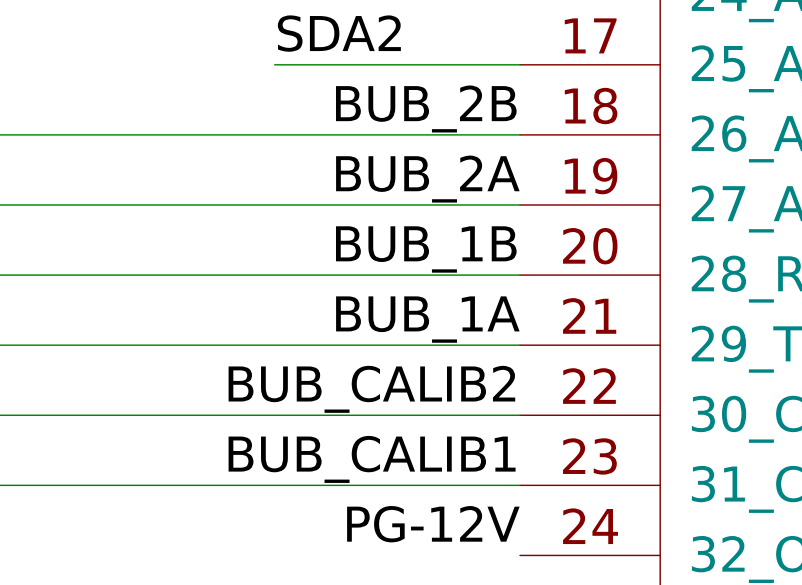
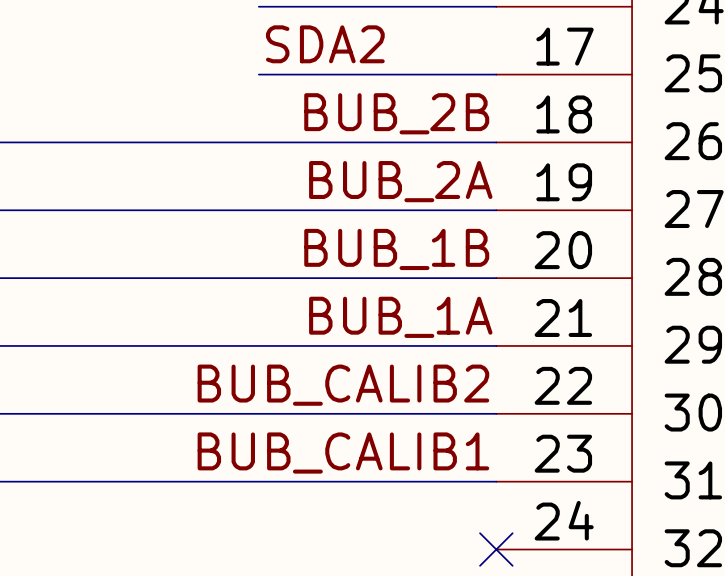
label: PG-12V (433, 524) -> none
no-connect mark: none -> (496, 549)

